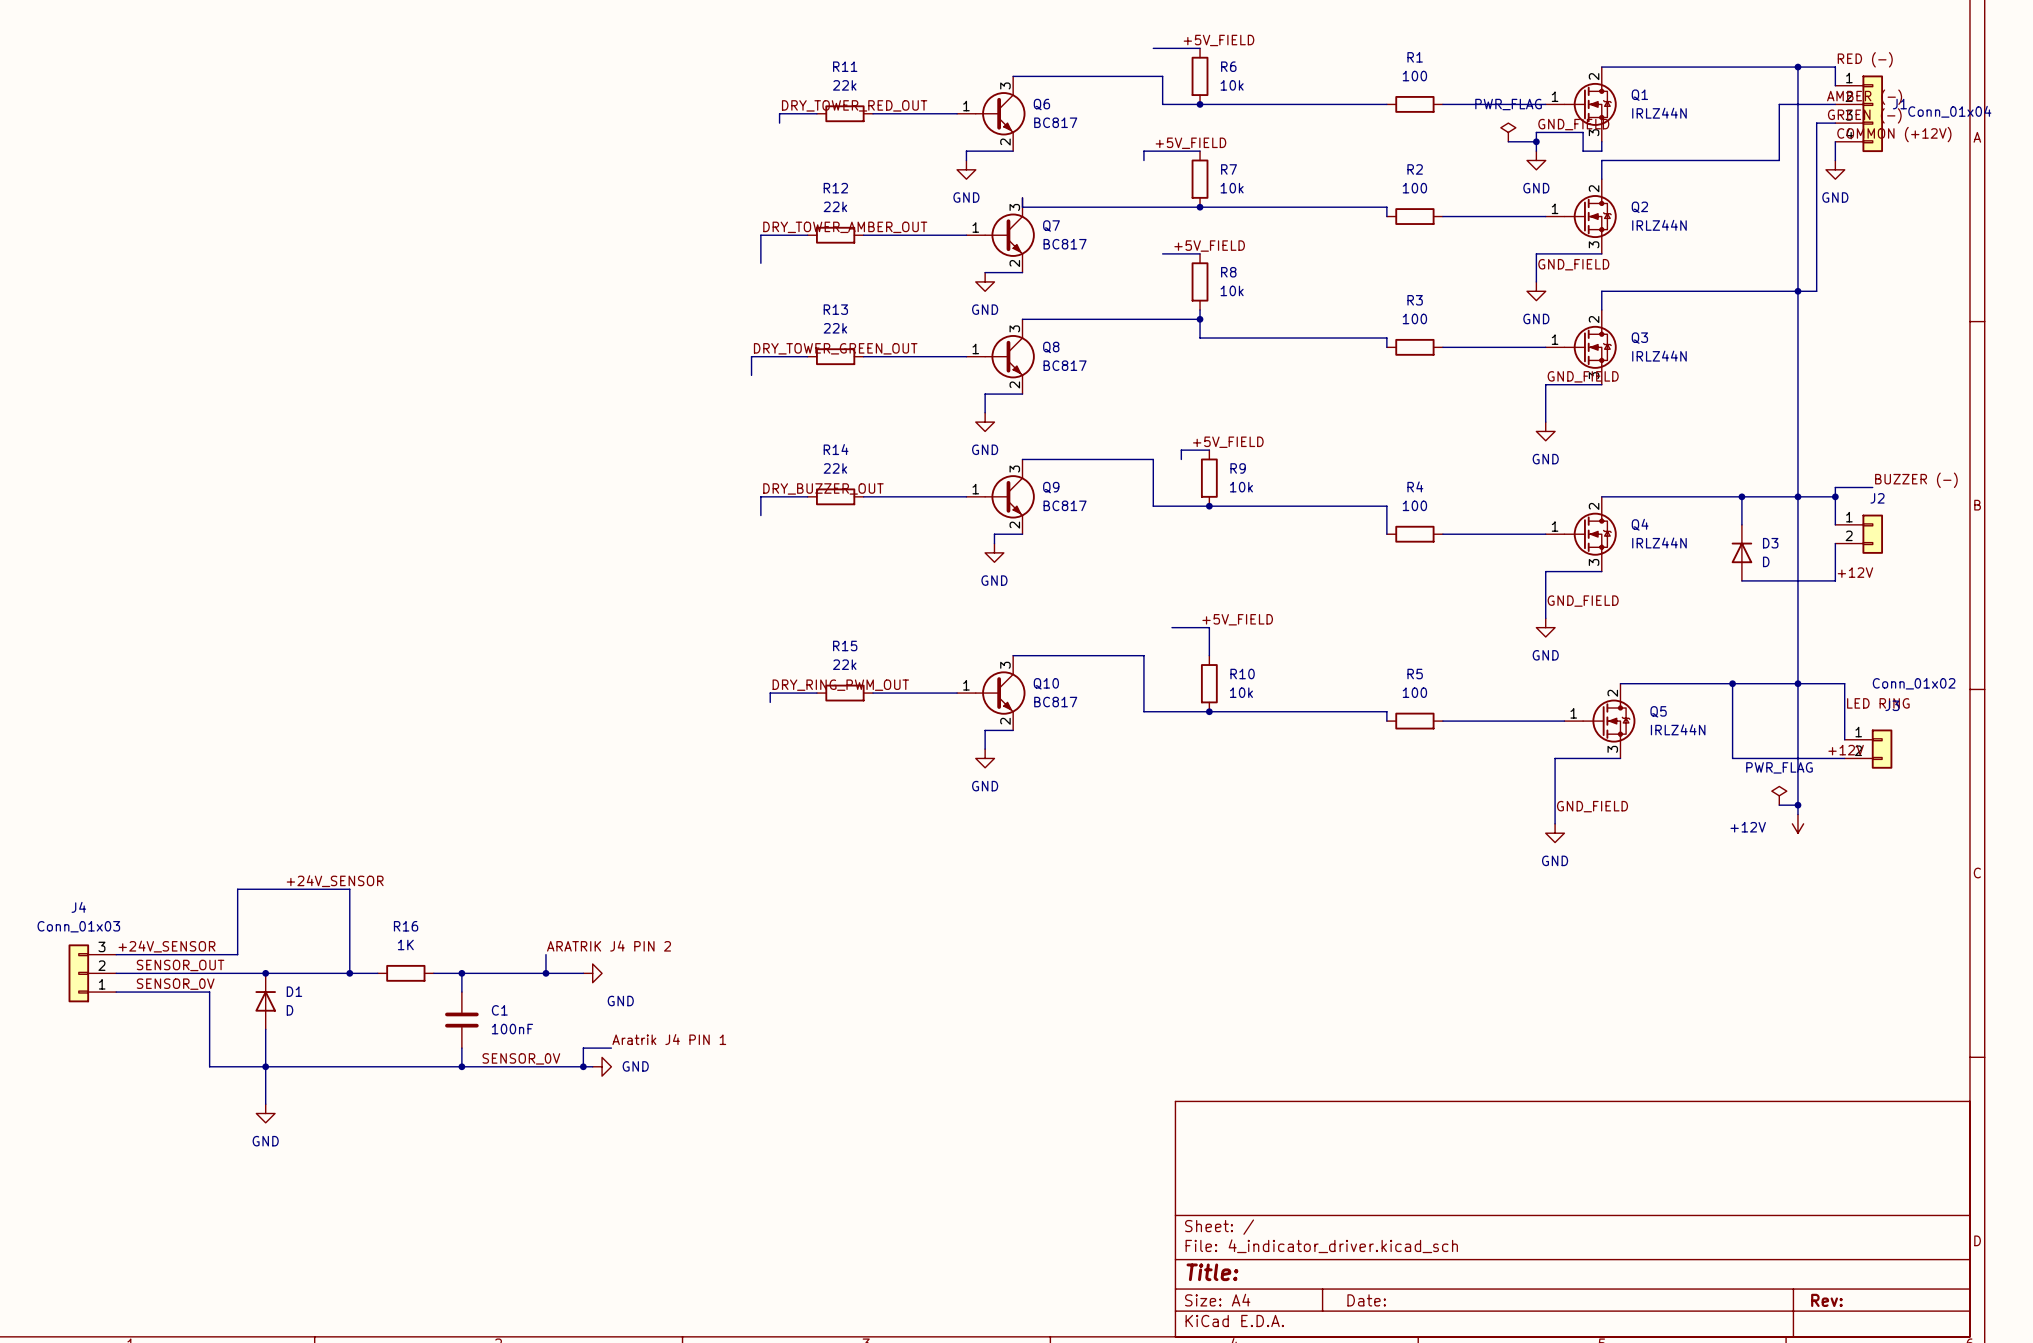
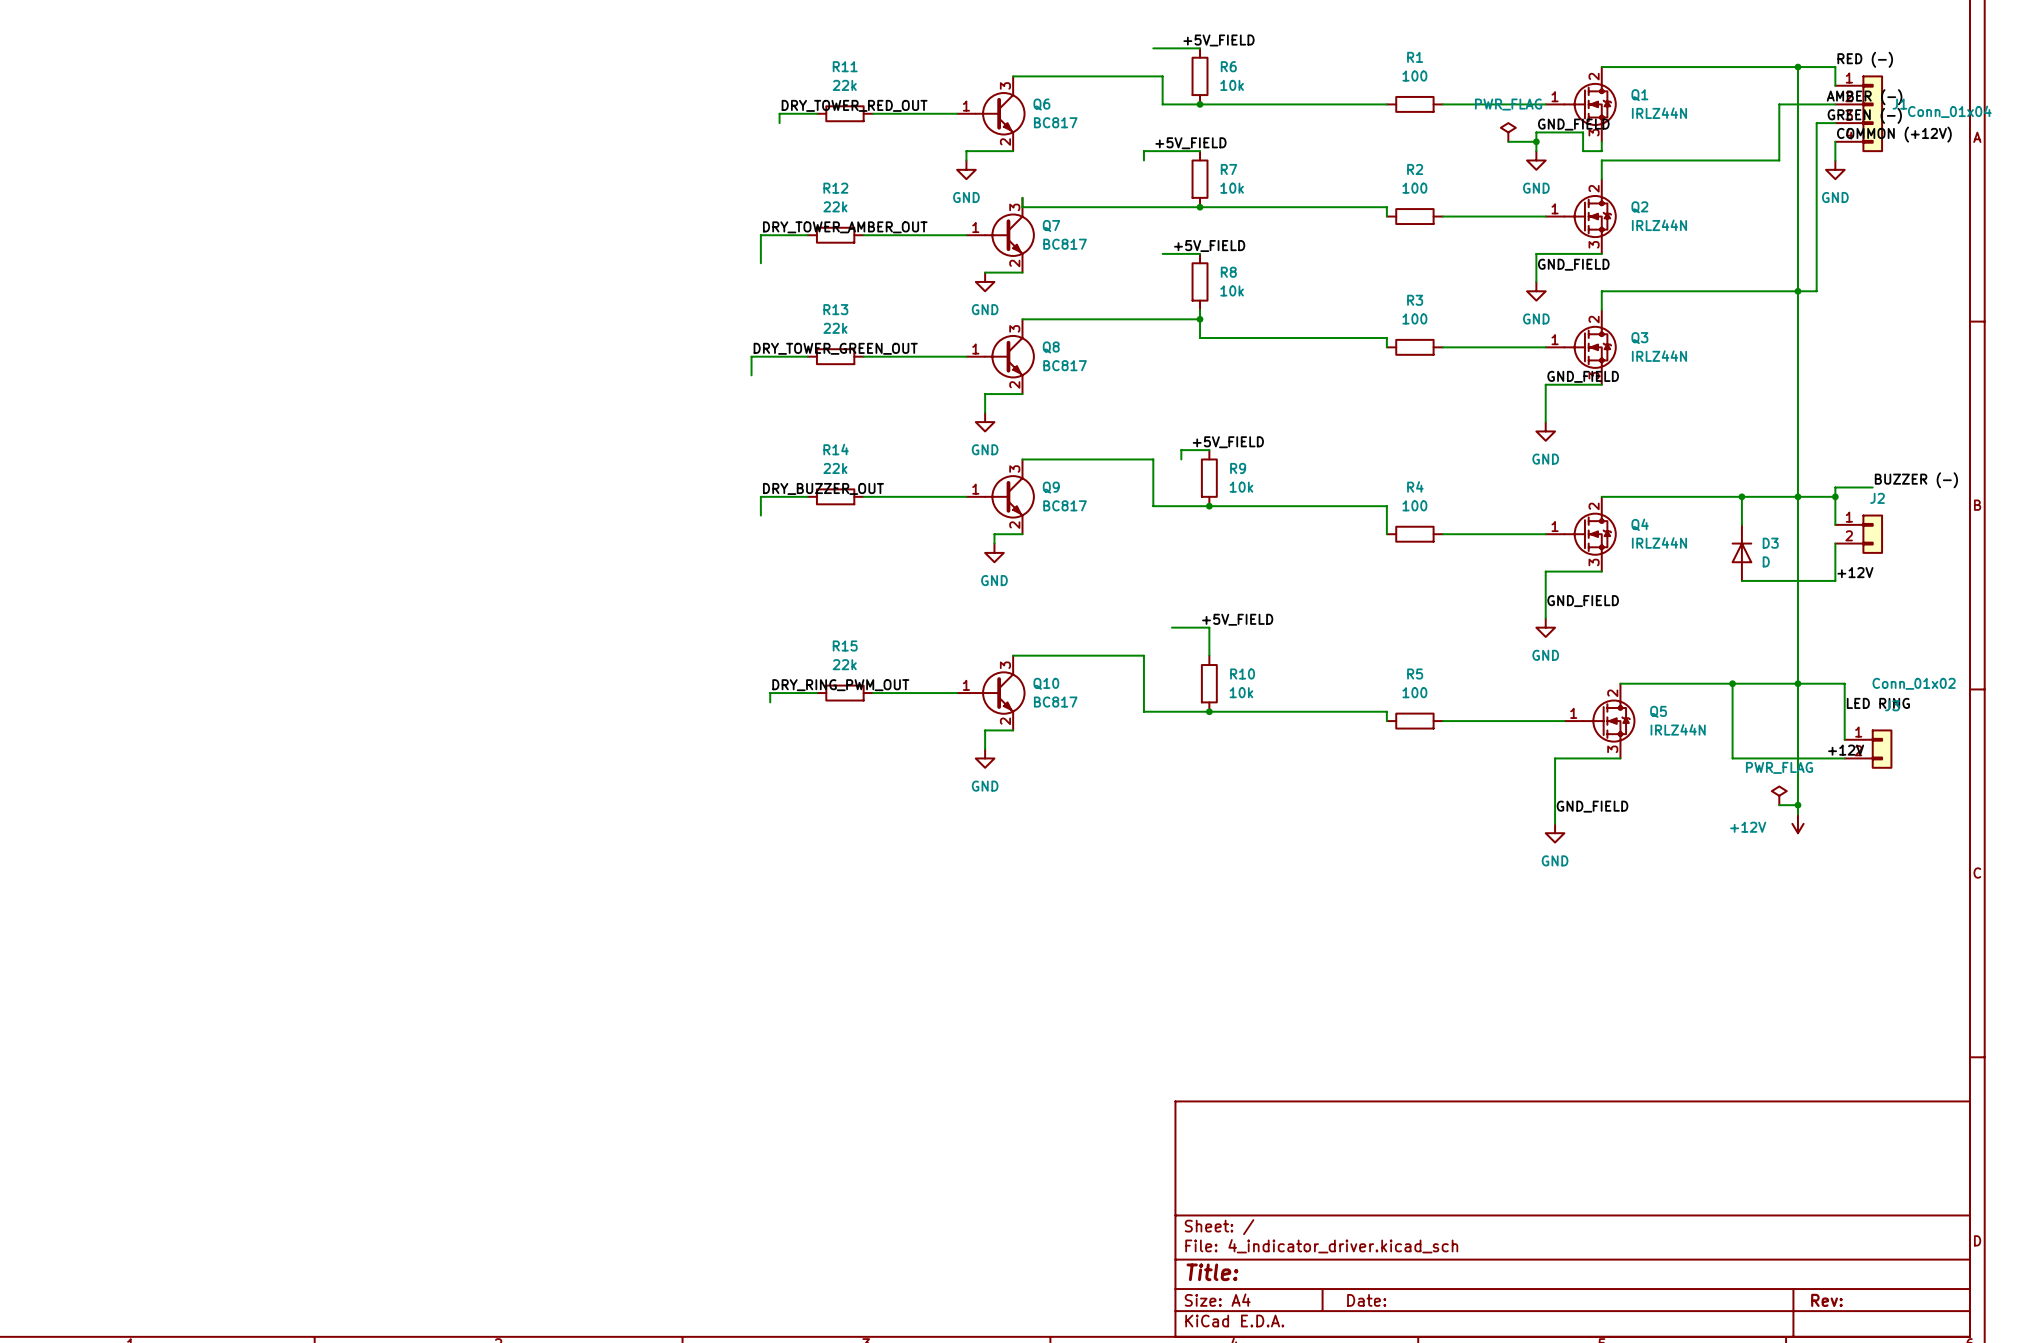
label: +24V_SENSOR (335, 881) -> none
label: +24V_SENSOR (166, 946) -> none
label: ARATRIK J4 PIN 2 (609, 946) -> none
wire: (116, 954) (237, 954) (237, 889) (349, 889) (349, 973) -> none
wire: (545, 954) (545, 973) -> none
label: SENSOR_OUT (180, 965) -> none
J4: Conn_01x03 (92, 973) -> none
wire: (116, 973) (377, 973) -> none
junction: (265, 973) -> none
junction: (349, 973) -> none
R16: 1K (405, 973) -> none
wire: (433, 973) (583, 973) -> none
wire: (461, 973) (461, 992) -> none
junction: (461, 973) -> none
junction: (545, 973) -> none
power symbol: GND (592, 973) -> none
label: SENSOR_0V (175, 984) -> none
wire: (116, 992) (209, 992) (209, 1066) (592, 1066) -> none
D1: D (265, 1001) -> none
C1: 100nF (461, 1020) -> none
wire: (265, 1029) (265, 1104) -> none
label: Aratrik J4 PIN 1 (669, 1039) -> none
wire: (461, 1048) (461, 1066) -> none
wire: (611, 1048) (583, 1048) (583, 1066) -> none
label: SENSOR_0V (521, 1058) -> none
junction: (265, 1066) -> none
junction: (461, 1066) -> none
junction: (583, 1066) -> none
power symbol: GND (602, 1066) -> none
power symbol: GND (265, 1113) -> none

